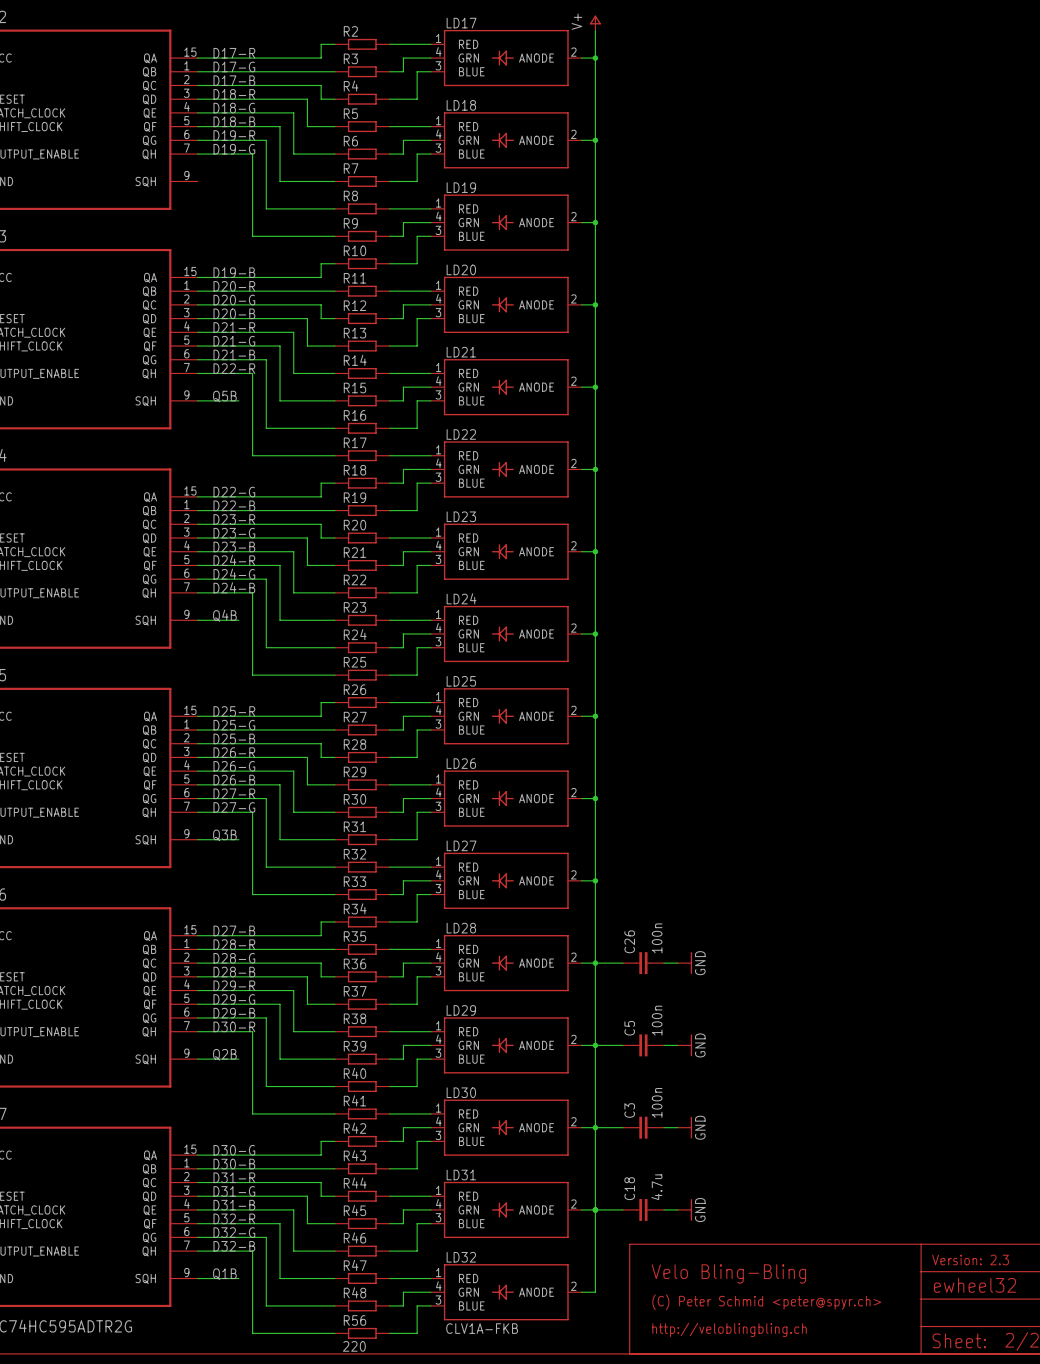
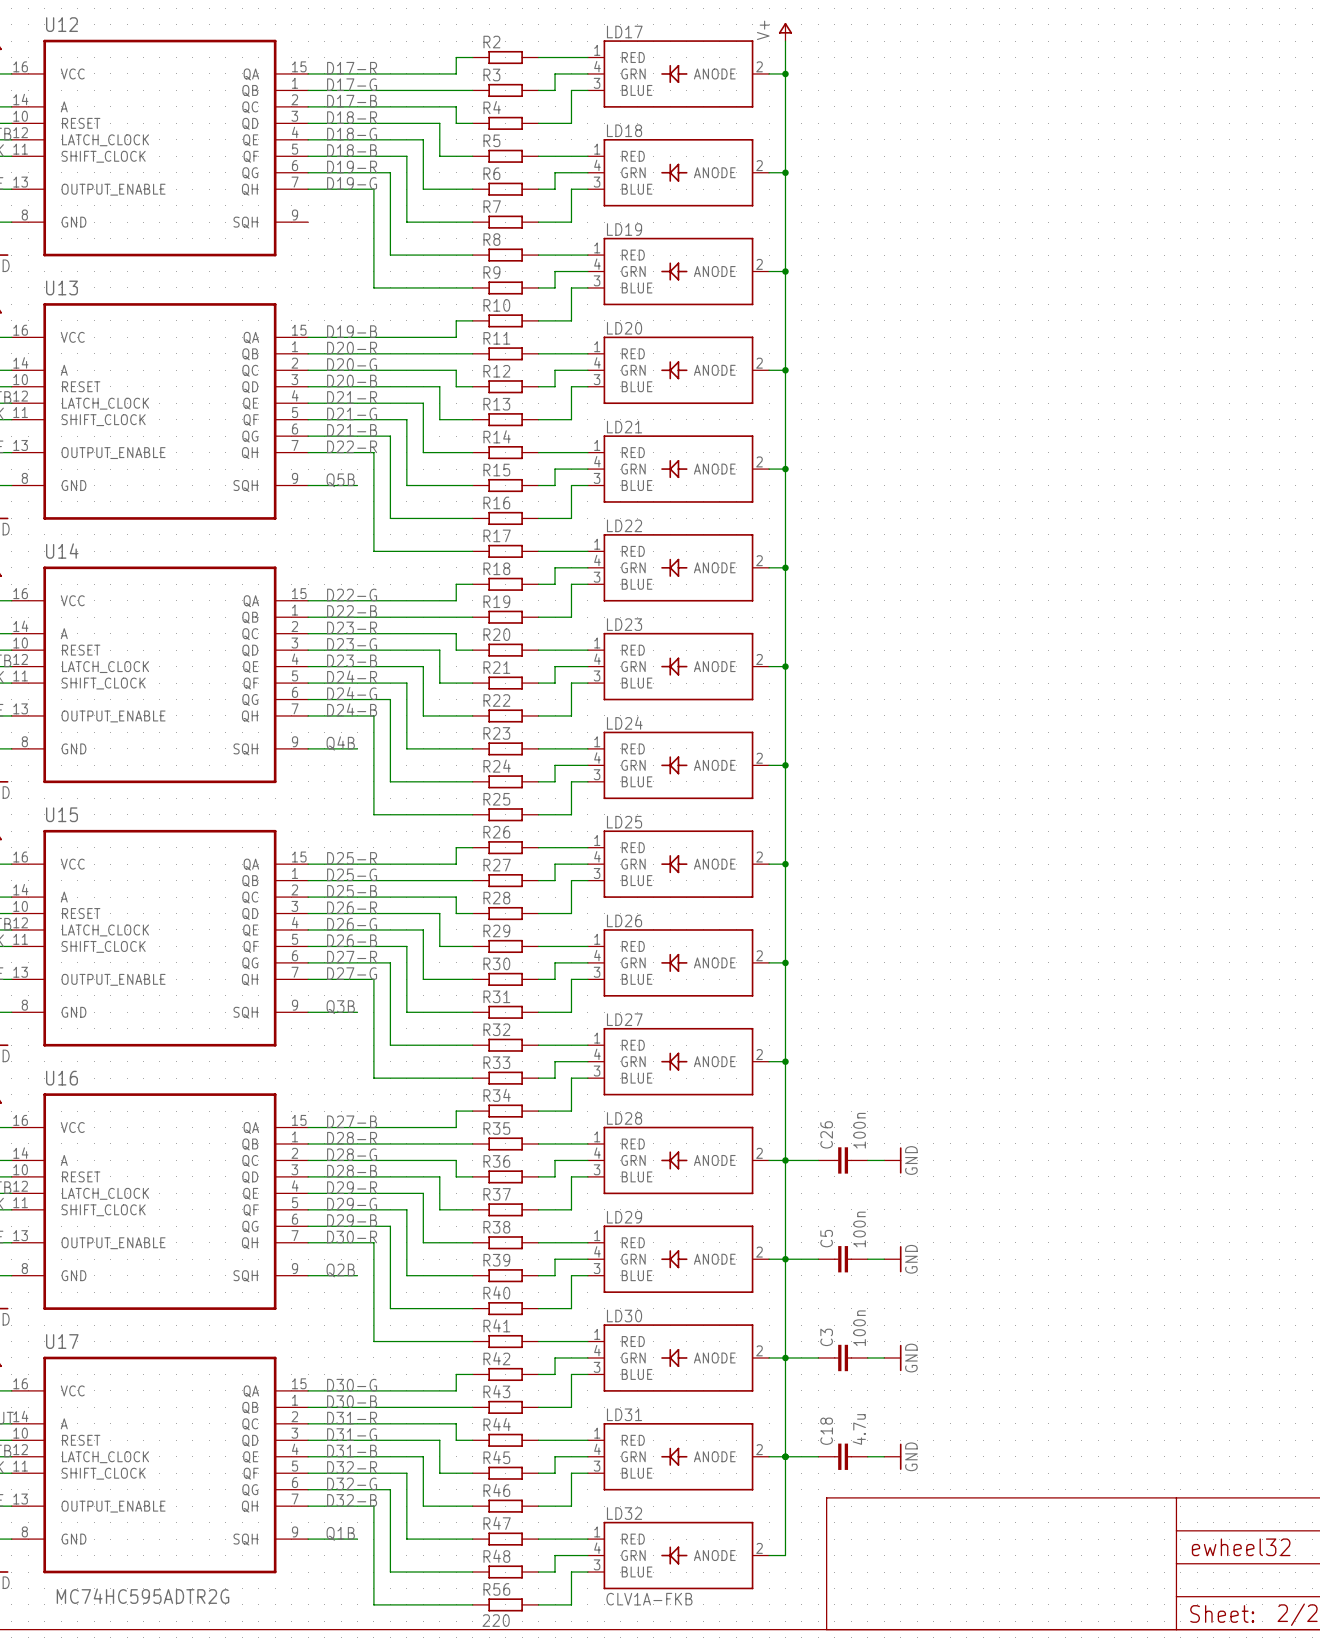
text: Version: 2.3 (970, 1260) -> none
text: Velo Bling-Bling (728, 1273) -> none
text: (C) Peter Schmid <peter@spyr.ch> (766, 1302) -> none
text: http://veloblingbling.ch (729, 1329) -> none

